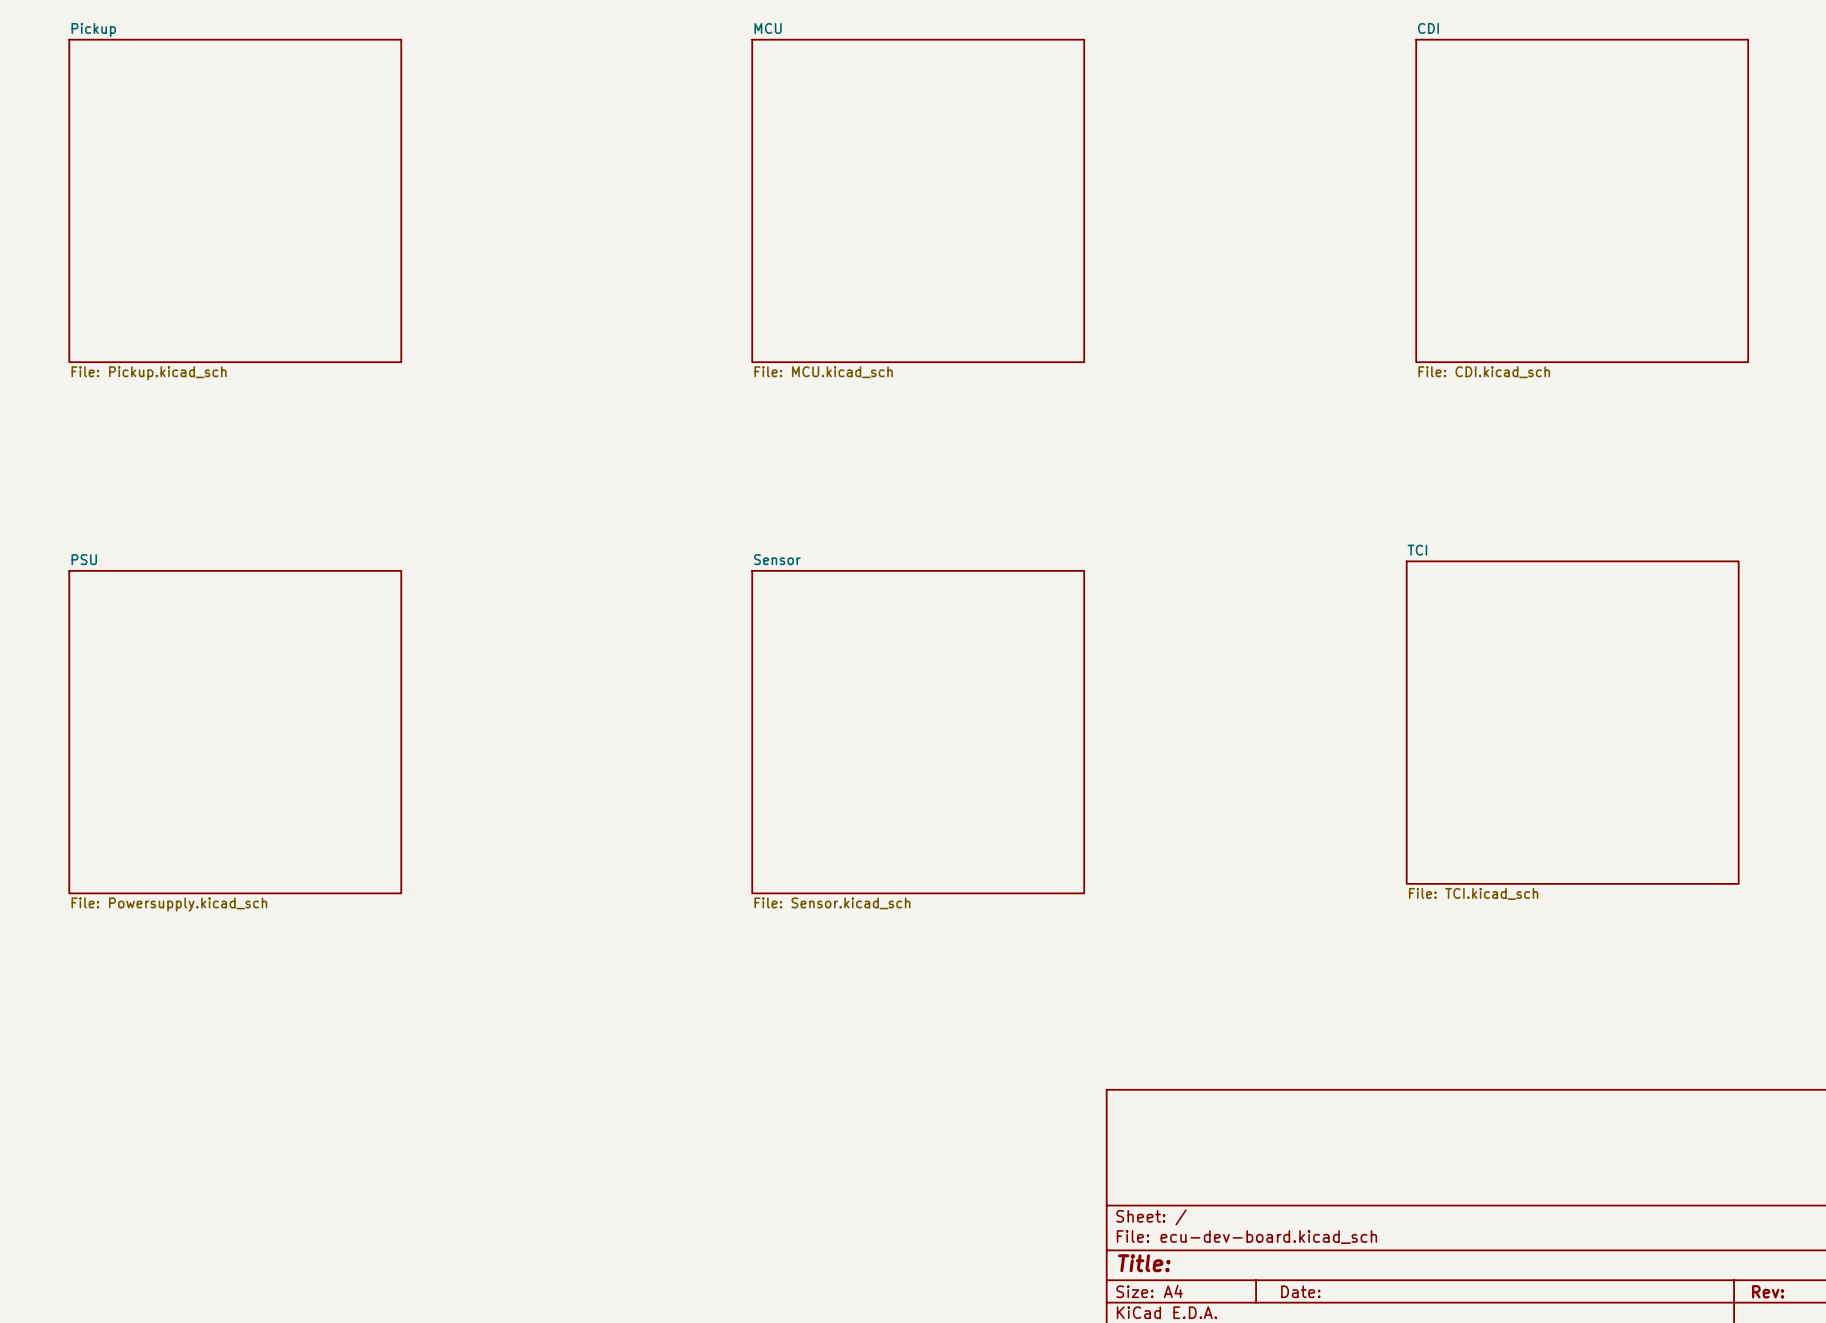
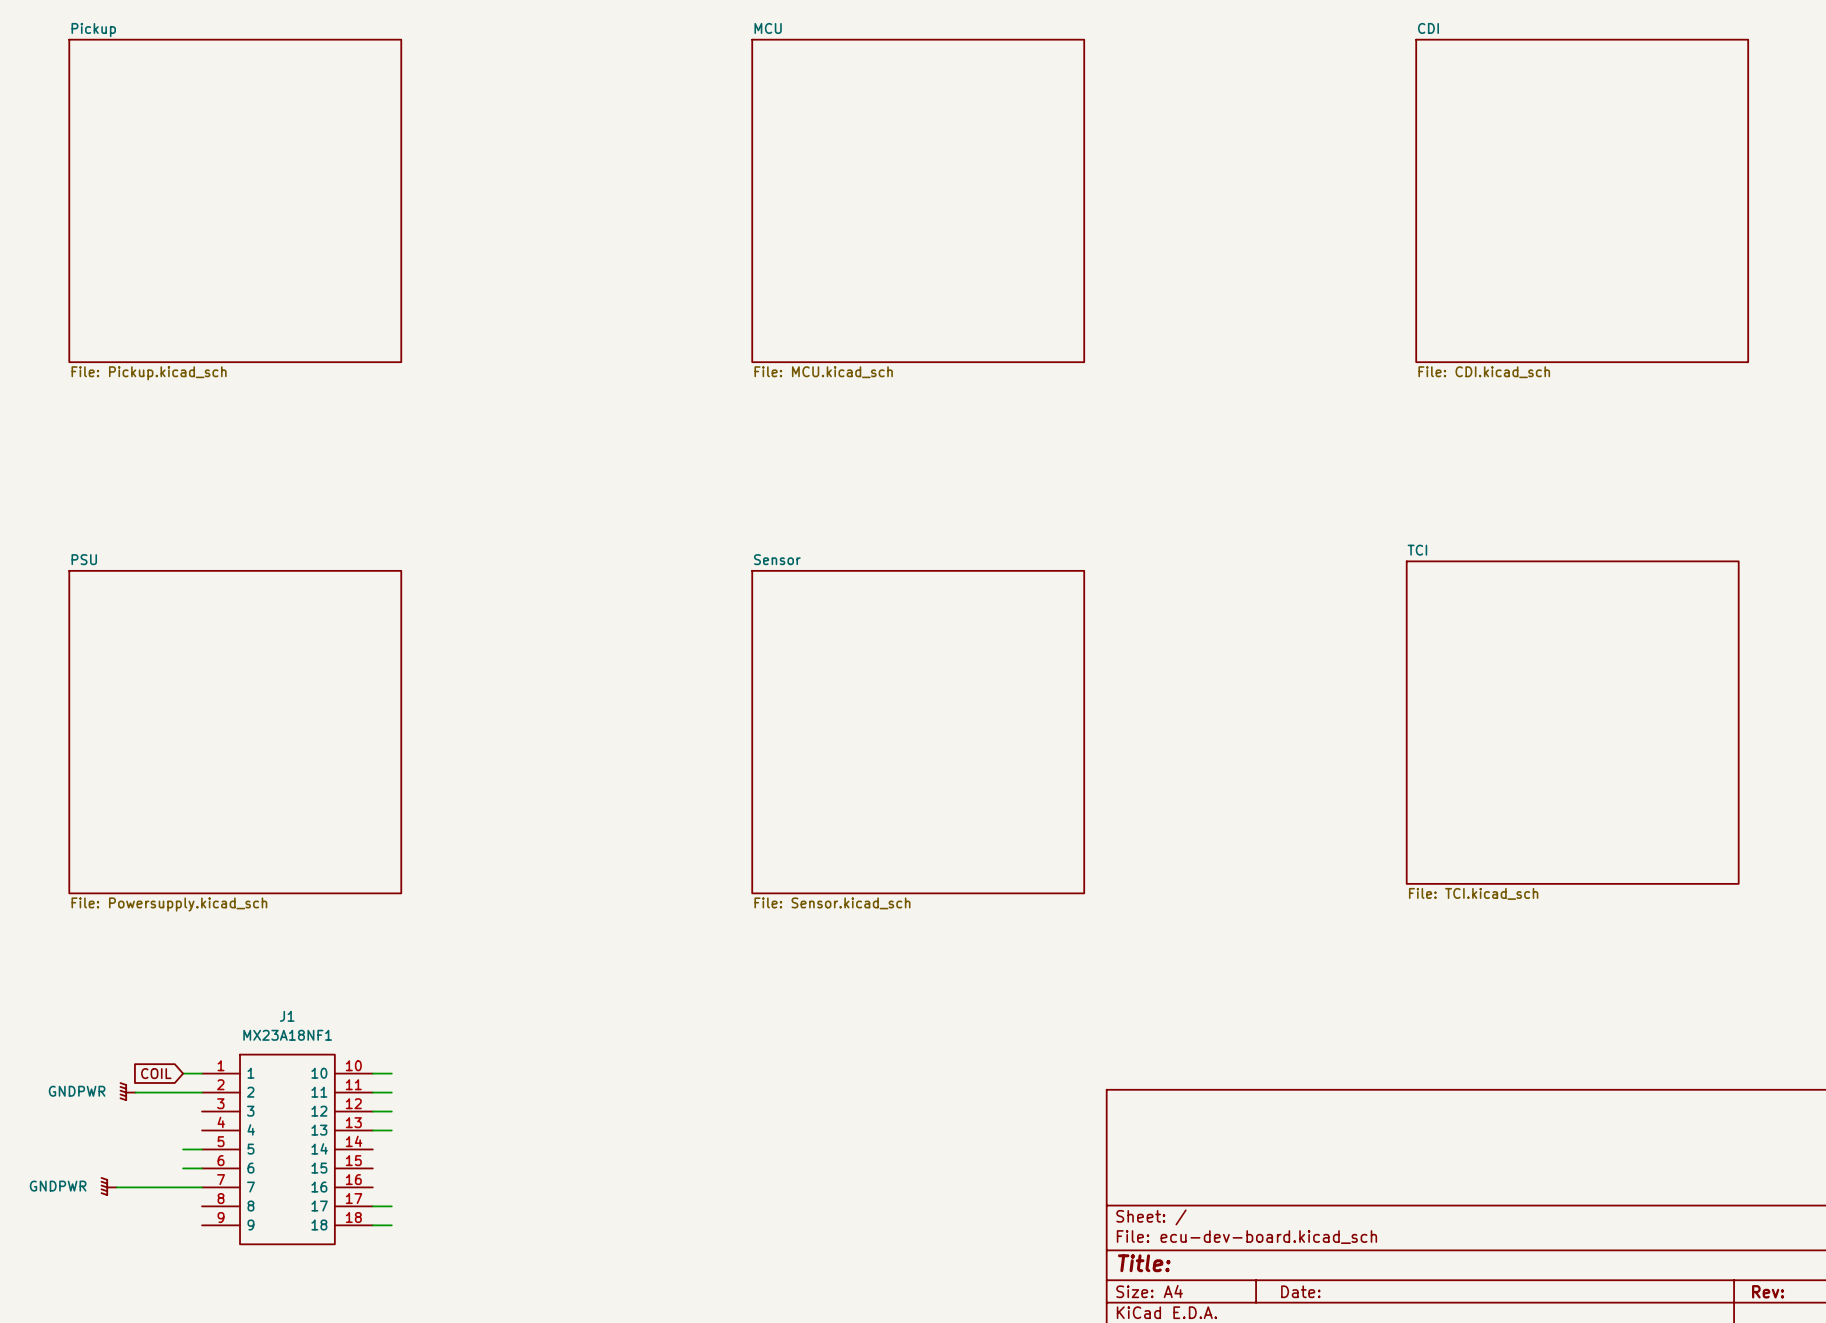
global label: none -> COIL (156, 1073)
wire: none -> (183, 1073) (202, 1073)
wire: none -> (372, 1073) (391, 1073)
power symbol: none -> GNDPWR (127, 1091)
wire: none -> (135, 1092) (202, 1092)
wire: none -> (372, 1092) (391, 1092)
wire: none -> (372, 1111) (391, 1111)
wire: none -> (372, 1130) (391, 1130)
wire: none -> (183, 1149) (202, 1149)
J1: none -> MX23A18NF1 (287, 1149)
wire: none -> (183, 1168) (202, 1168)
power symbol: none -> GNDPWR (108, 1186)
wire: none -> (116, 1187) (202, 1187)
wire: none -> (372, 1206) (391, 1206)
wire: none -> (372, 1225) (391, 1225)

